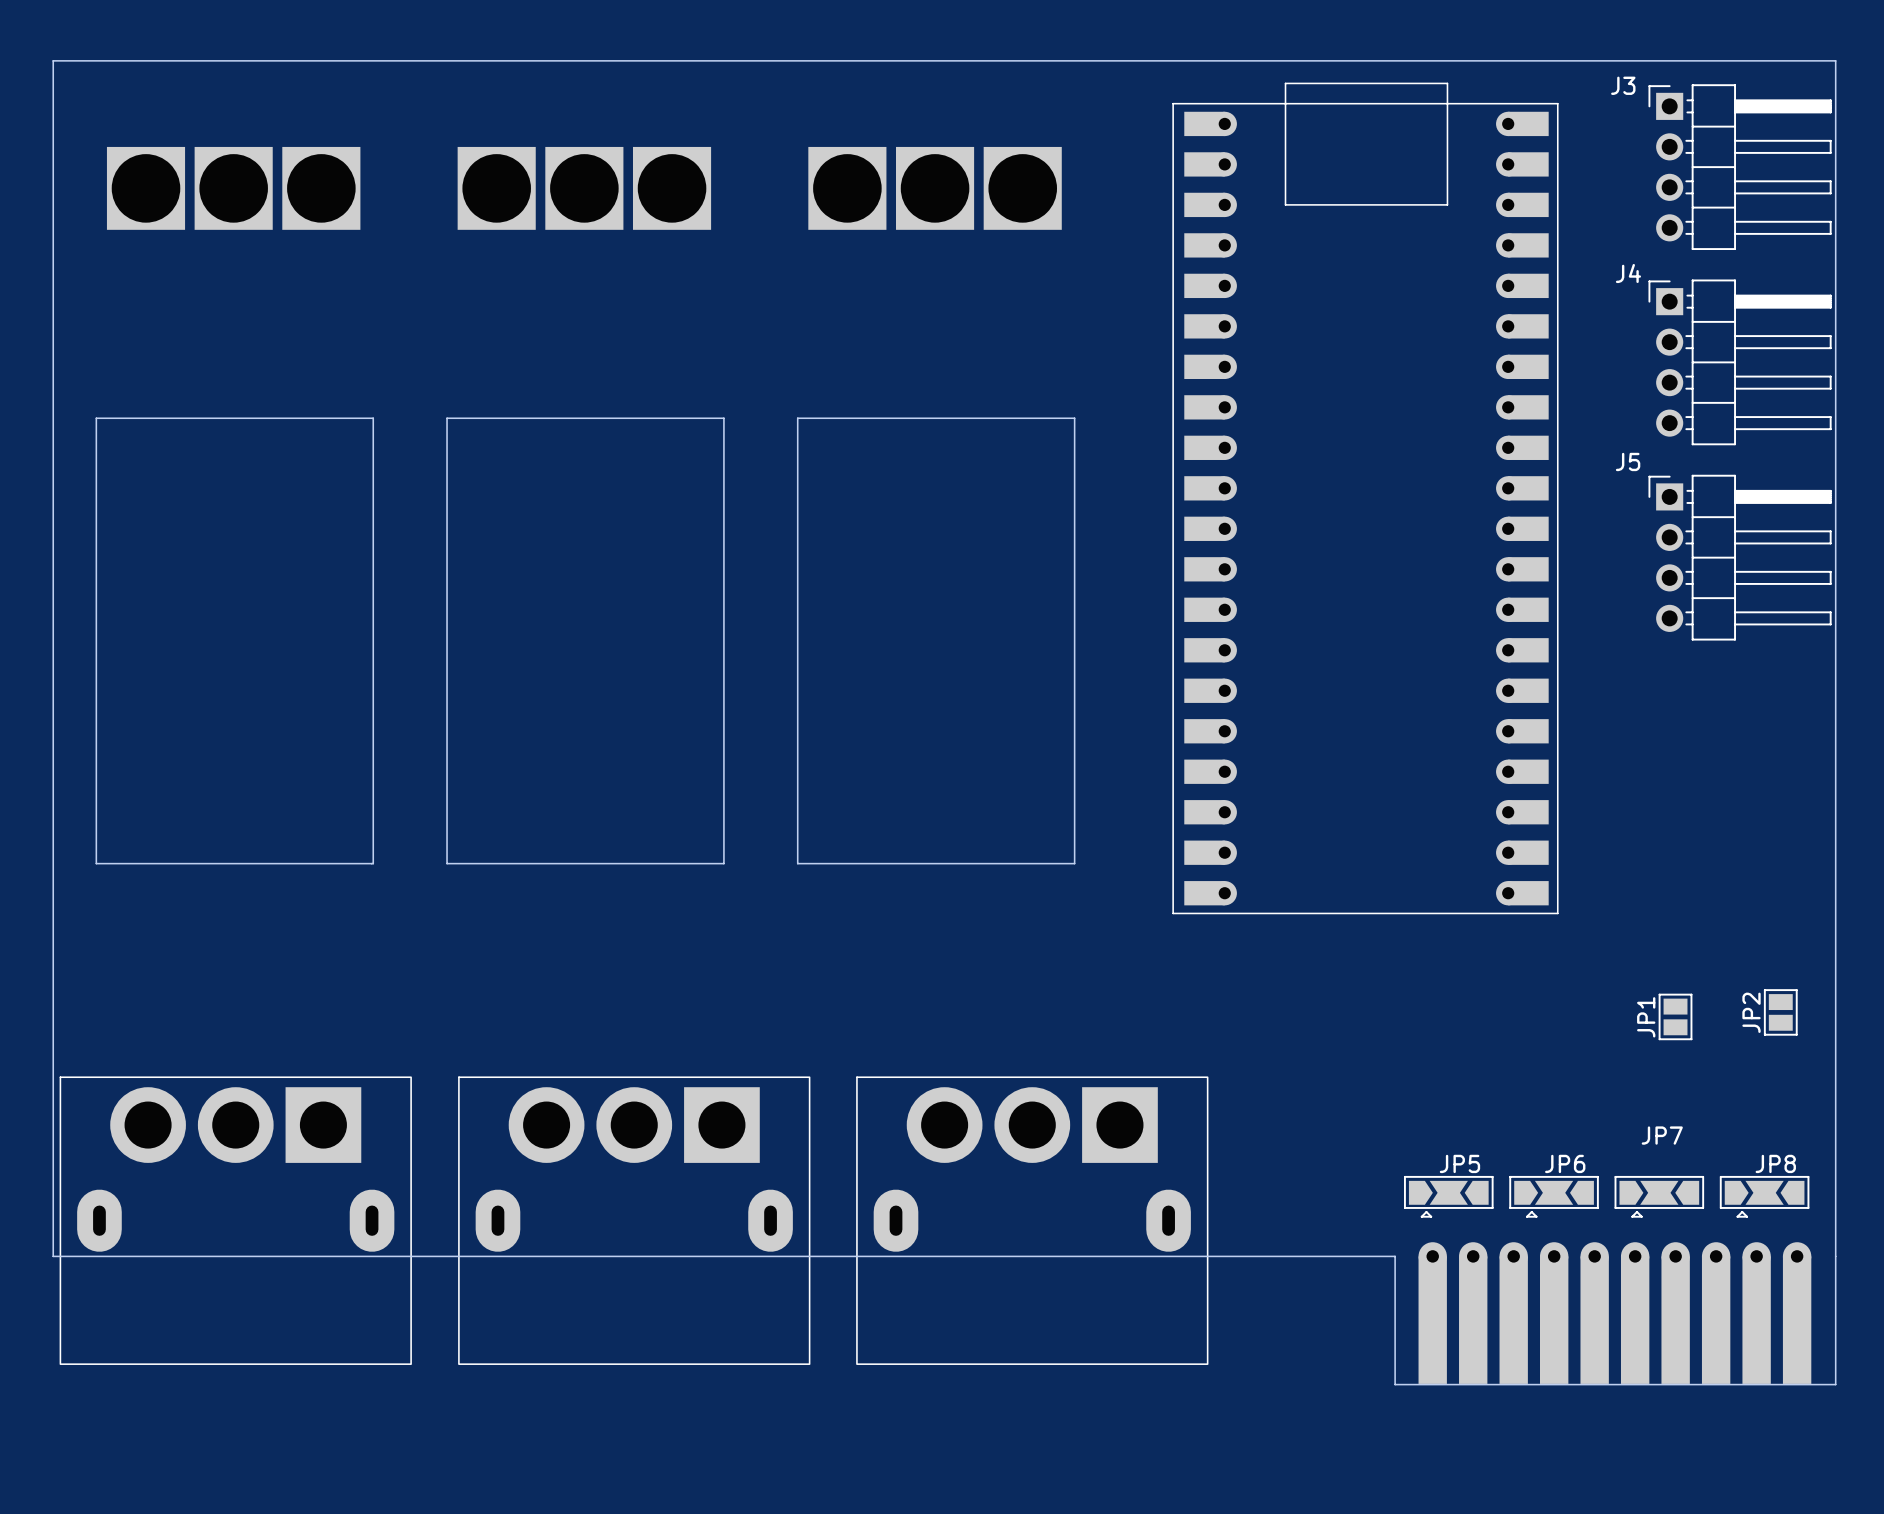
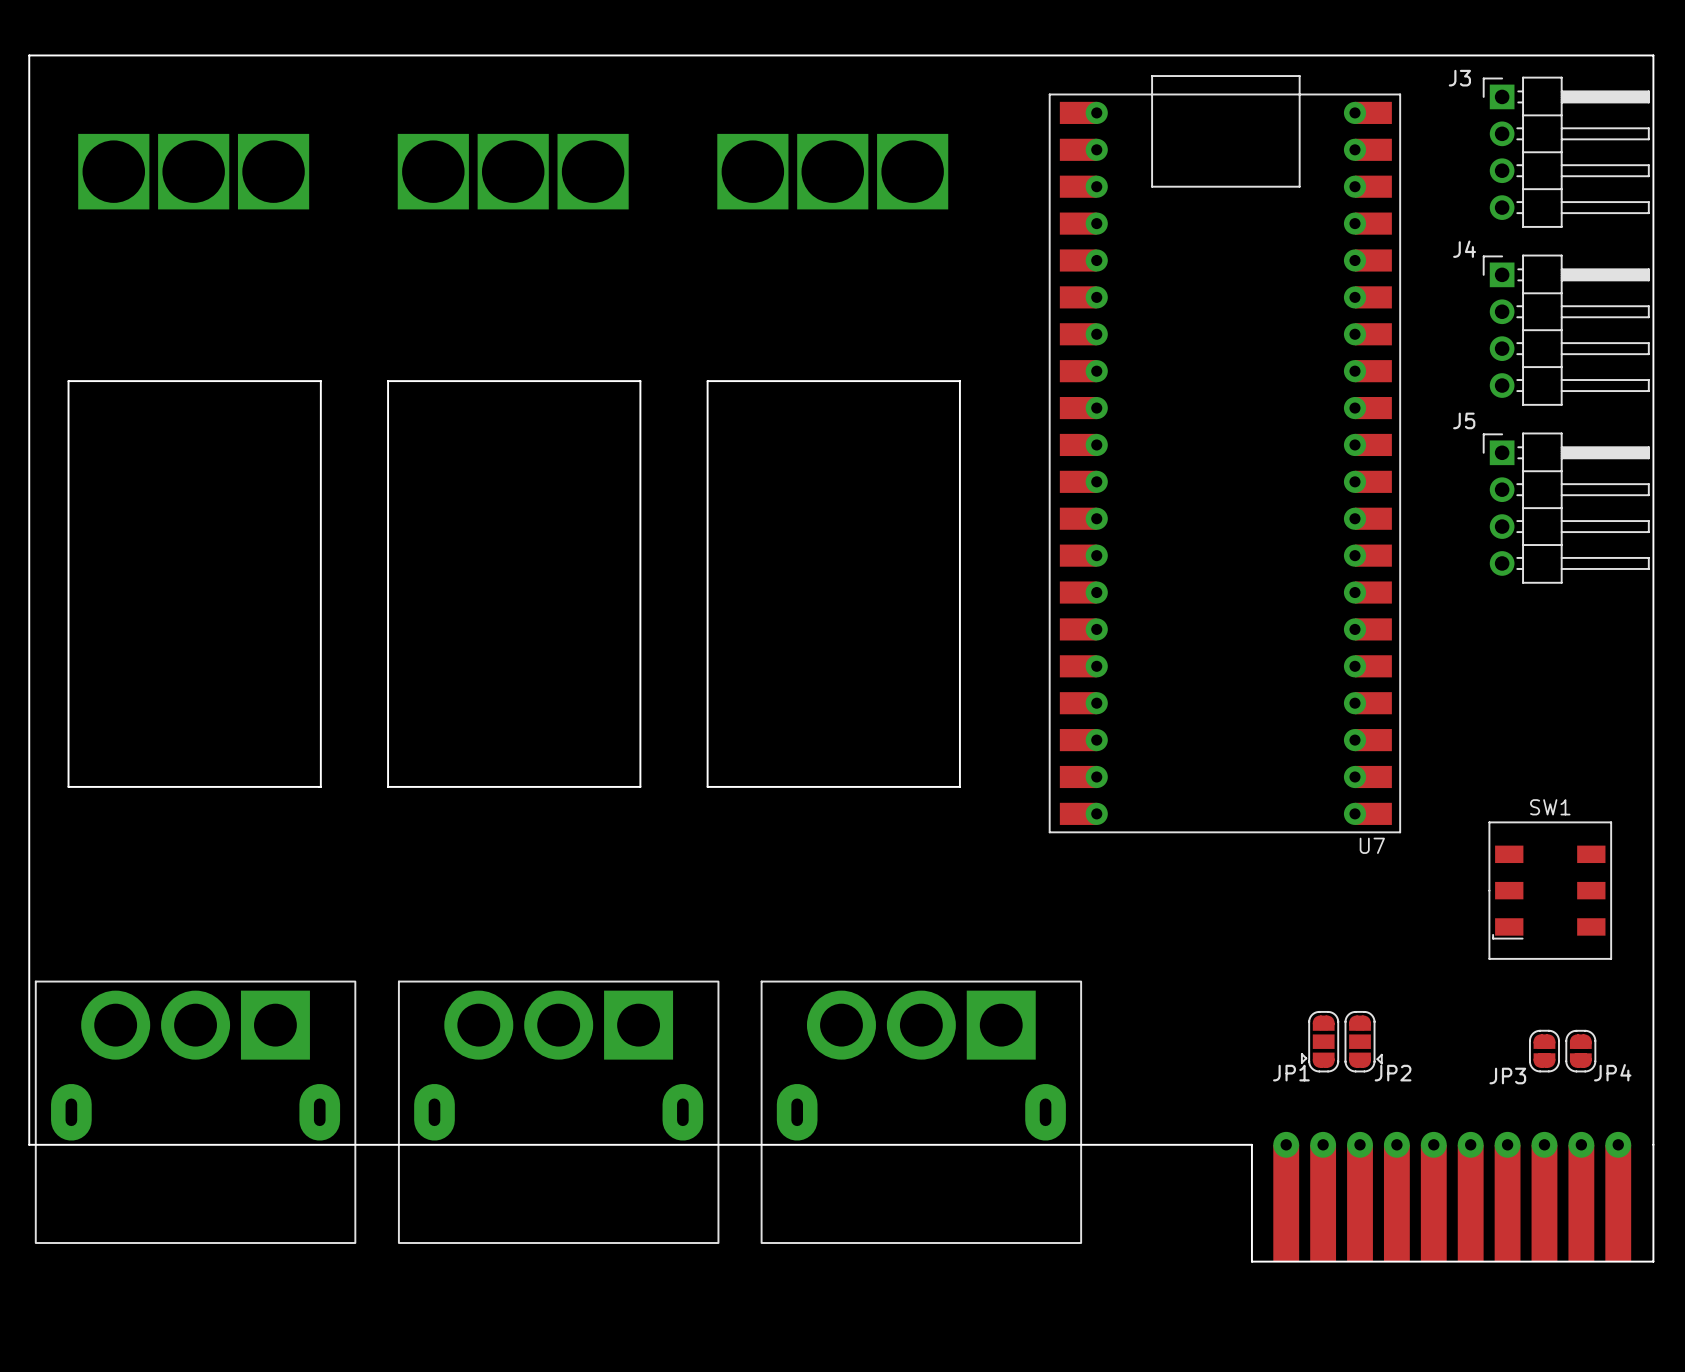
U7 name: none -> U7 (1372, 845)
SW1: none -> (1550, 890)
JP2 footprint: [1763, 989, 1798, 1036] -> [1344, 1011, 1383, 1073]
JP1 footprint: [1658, 993, 1693, 1041] -> [1301, 1011, 1340, 1073]
JP2 name position: JP2 (1751, 1012) -> JP2 (1393, 1073)
JP1 name position: JP1 (1646, 1017) -> JP1 (1291, 1073)
JP3: none -> (1544, 1051)
JP4: none -> (1580, 1051)
JP5: (1448, 1196) -> none
JP6: (1554, 1196) -> none
JP7: (1659, 1196) -> none
JP8: (1764, 1196) -> none

